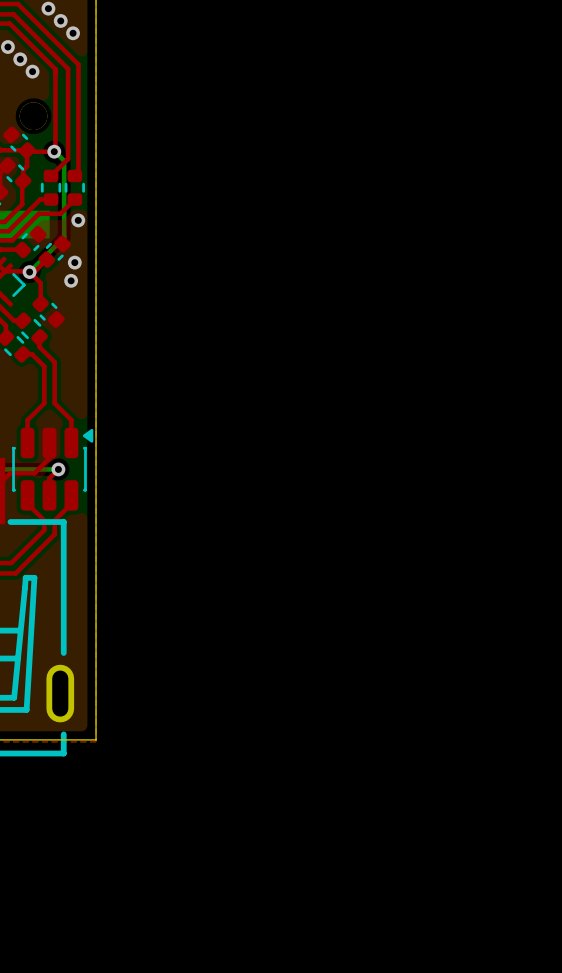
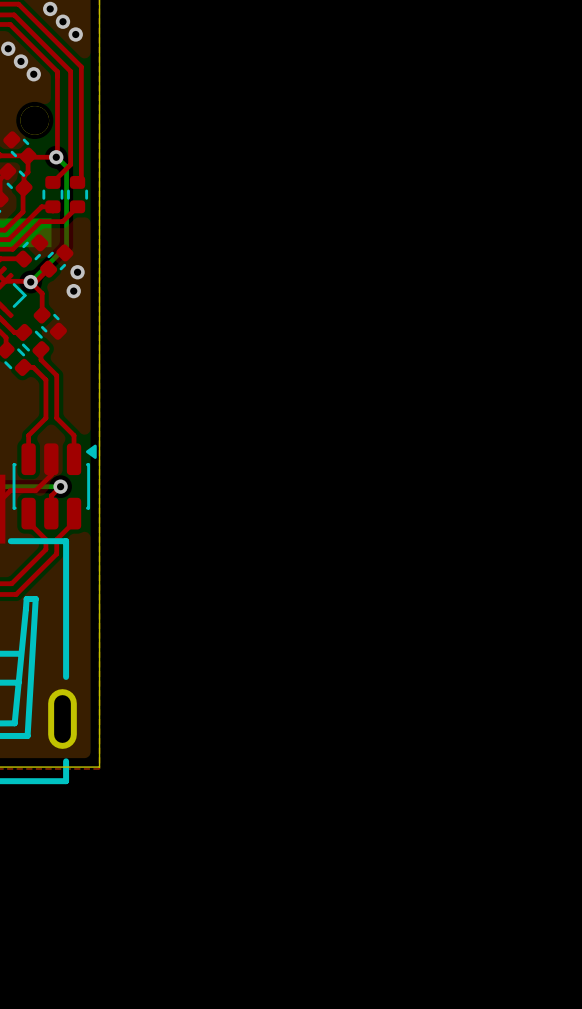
via: (78, 220) -> none

